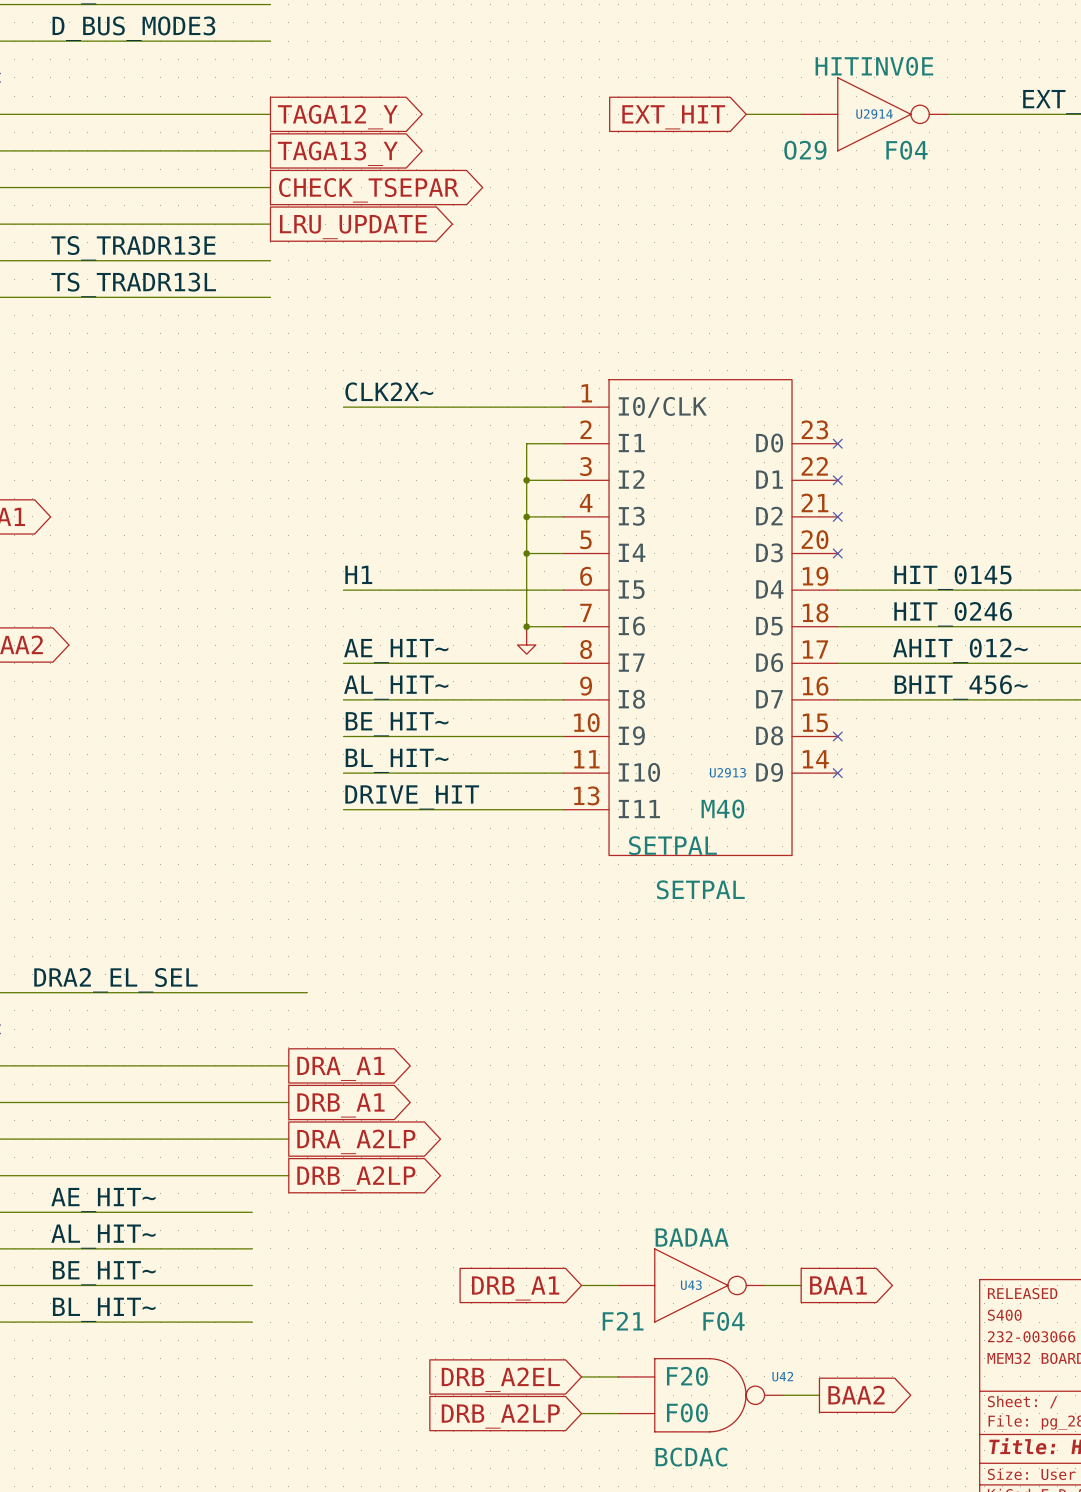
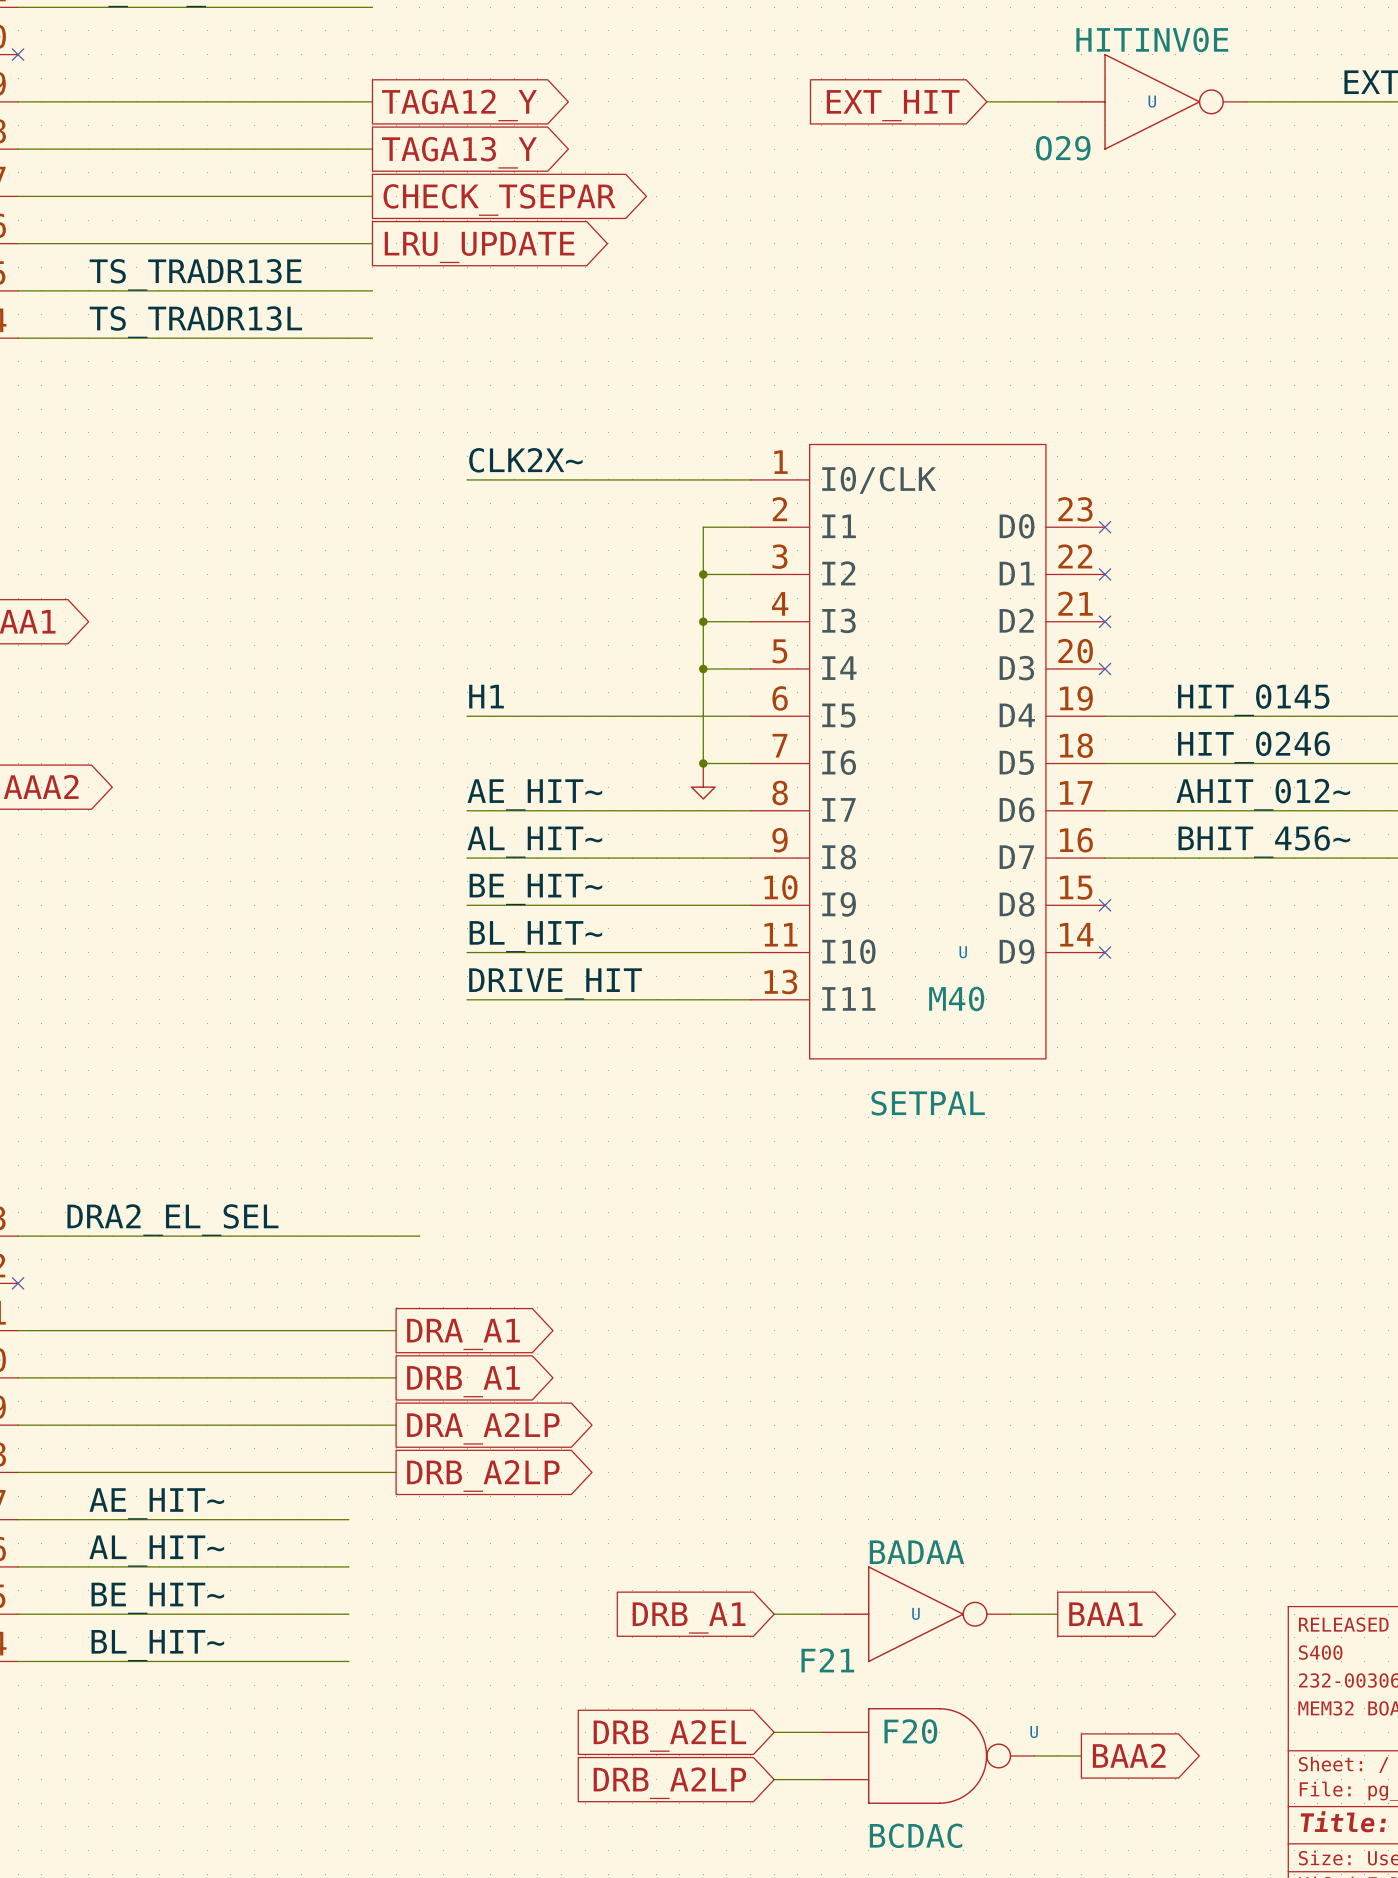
U2914 name: U2914 (874, 114) -> U (1152, 101)
U2914 value: F04 (907, 150) -> none
U2913 name: U2913 (727, 772) -> U (963, 952)
U2913 value: SETPAL (672, 845) -> none
U43 name: U43 (691, 1285) -> U (915, 1613)
U43 value: F04 (724, 1321) -> none
U42 name: U42 (782, 1376) -> U (1034, 1732)
U42 value: F00 (687, 1412) -> none

